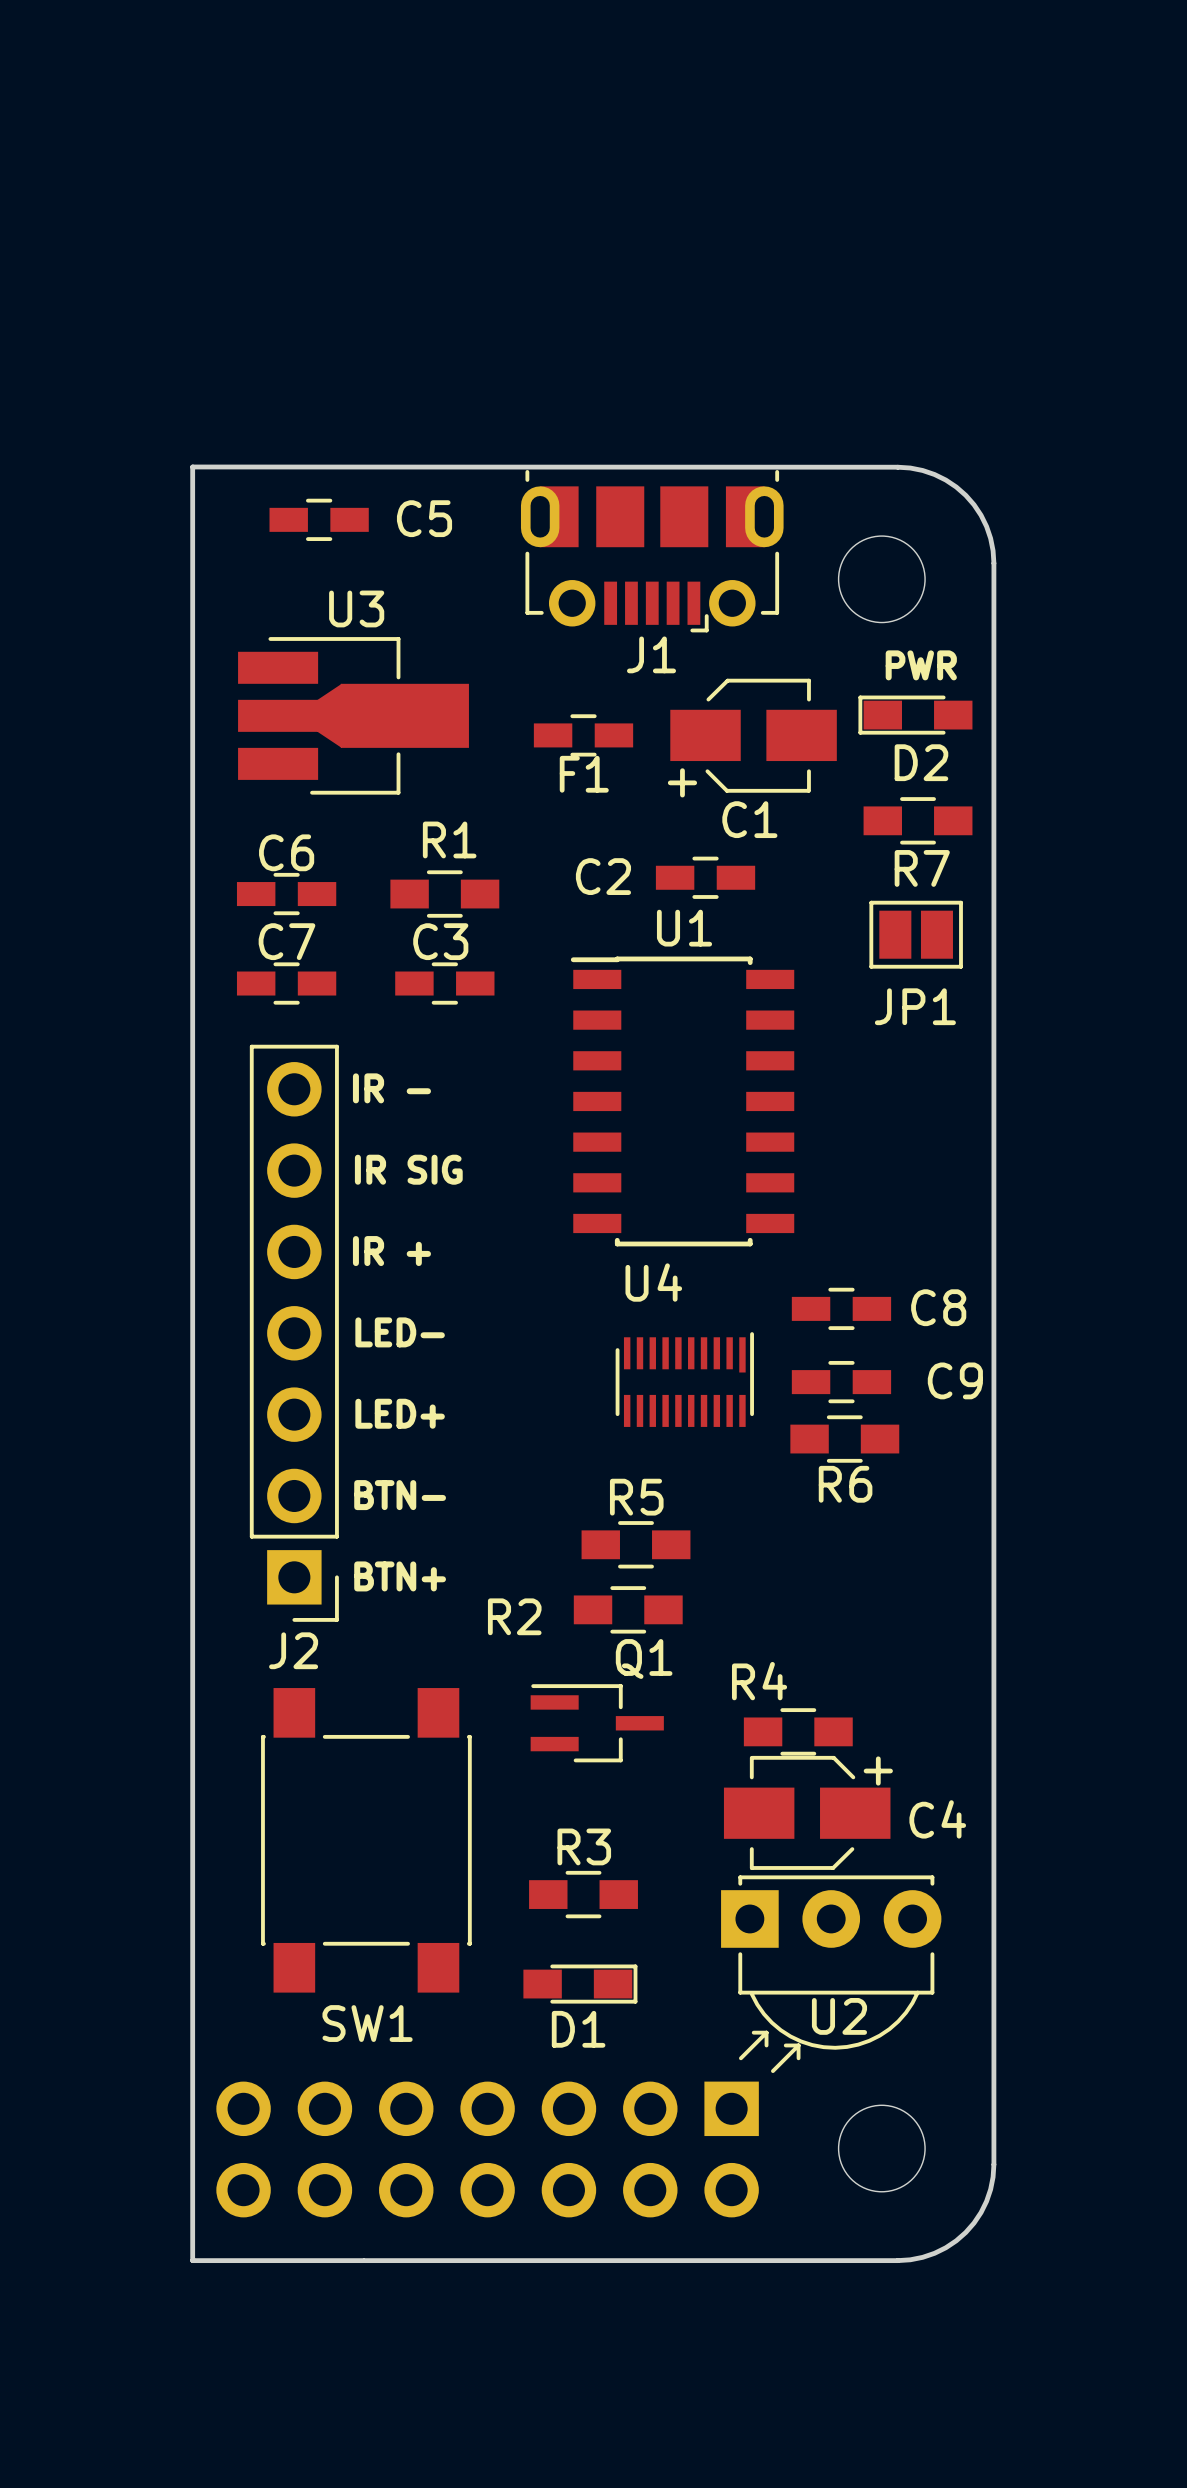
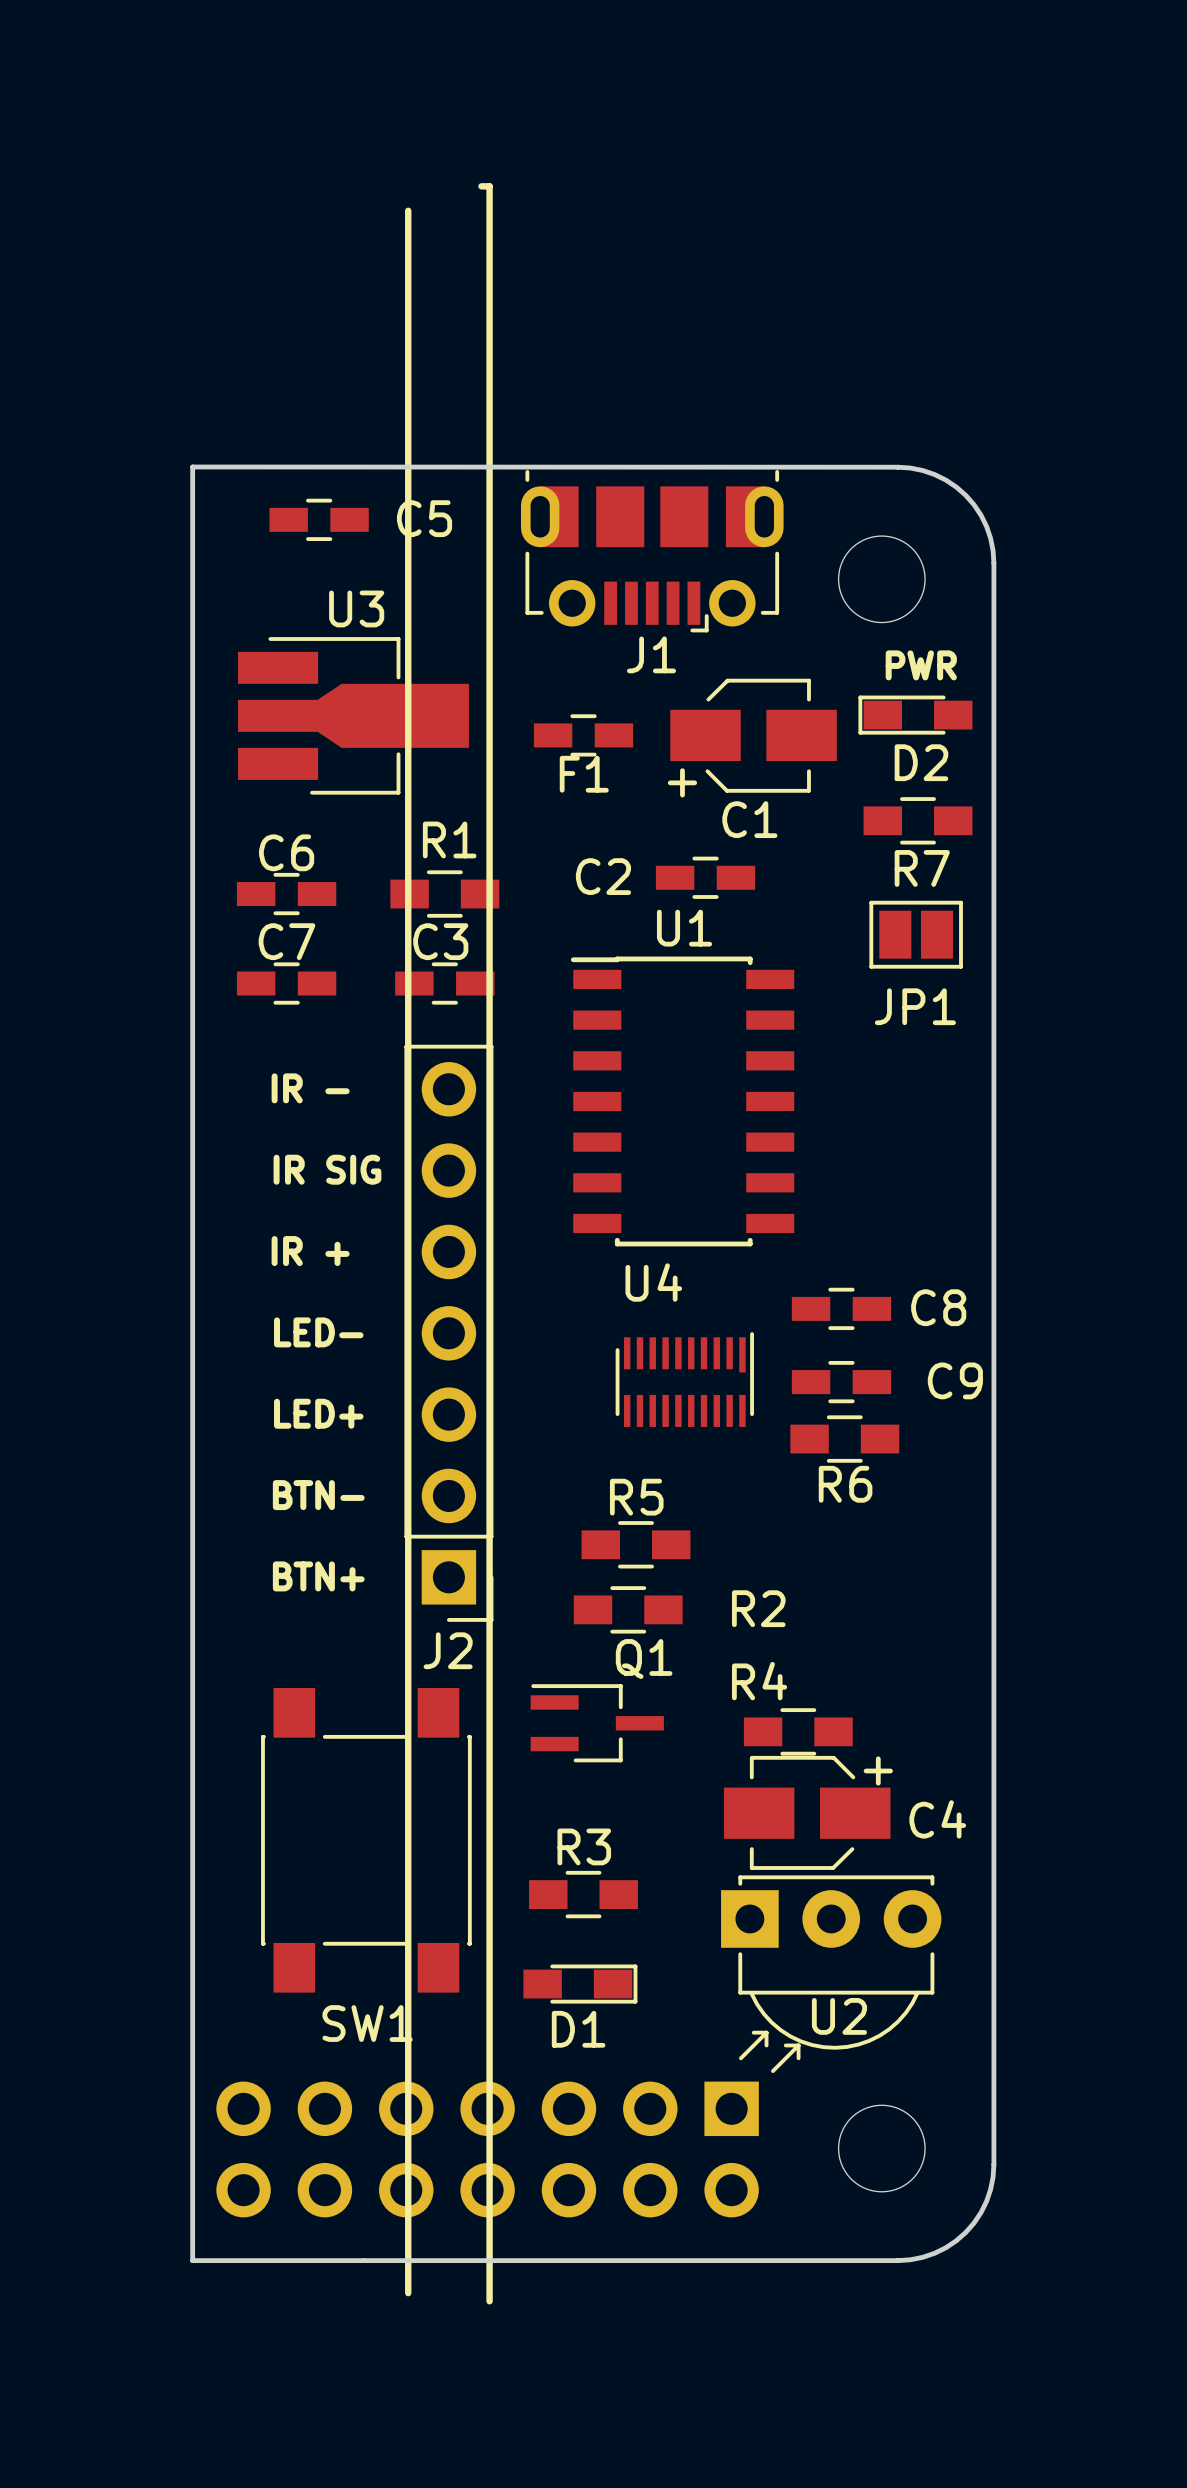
line: none -> (481, 186) (489, 186) (489, 2301)
line: none -> (408, 210) (408, 2293)
text position: IR - (391, 1088) -> IR - (310, 1088)
text position: IR SIG (408, 1169) -> IR SIG (327, 1169)
text position: IR + (391, 1251) -> IR + (310, 1251)
text position: LED- (400, 1332) -> LED- (318, 1332)
J2 position: (294, 1333) -> (448, 1333)
text position: LED+ (400, 1413) -> LED+ (318, 1413)
text position: BTN- (400, 1495) -> BTN- (318, 1495)
text position: BTN+ (400, 1576) -> BTN+ (318, 1576)
R2 name position: R2 (514, 1616) -> R2 (758, 1608)

